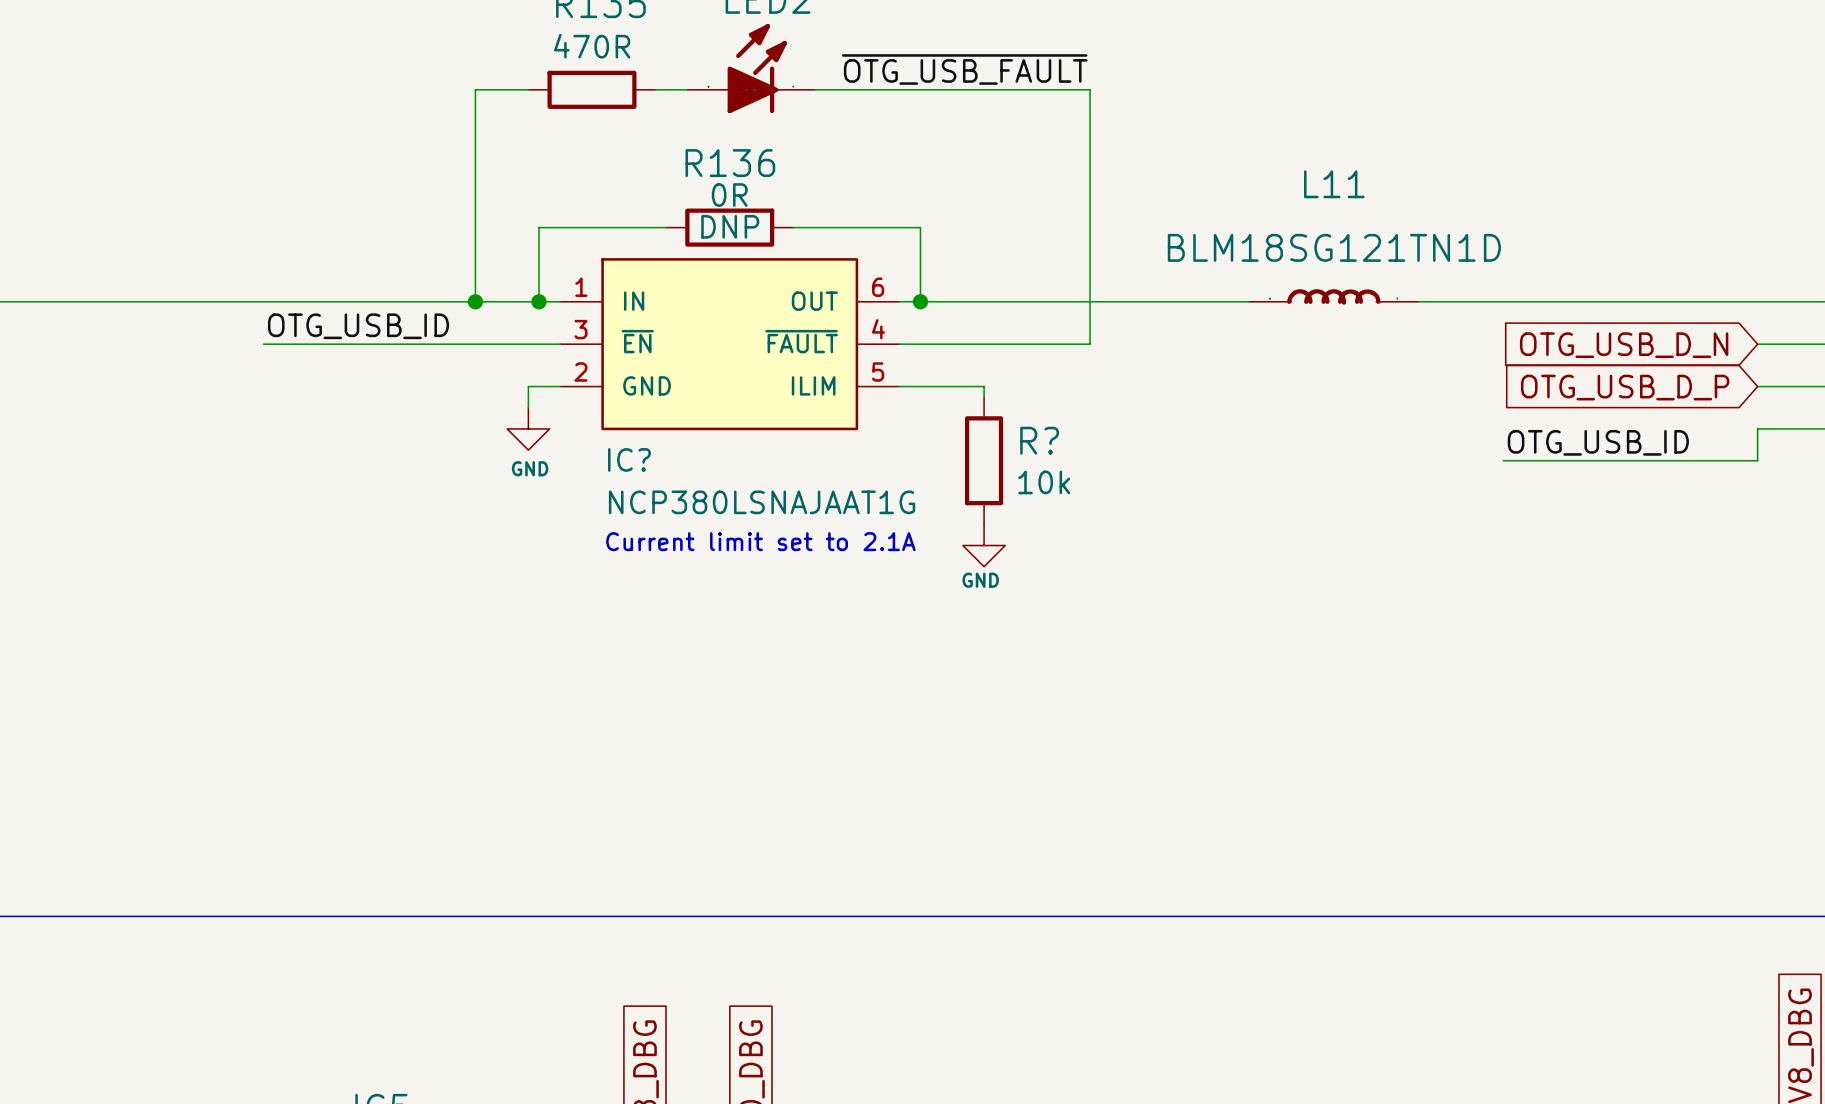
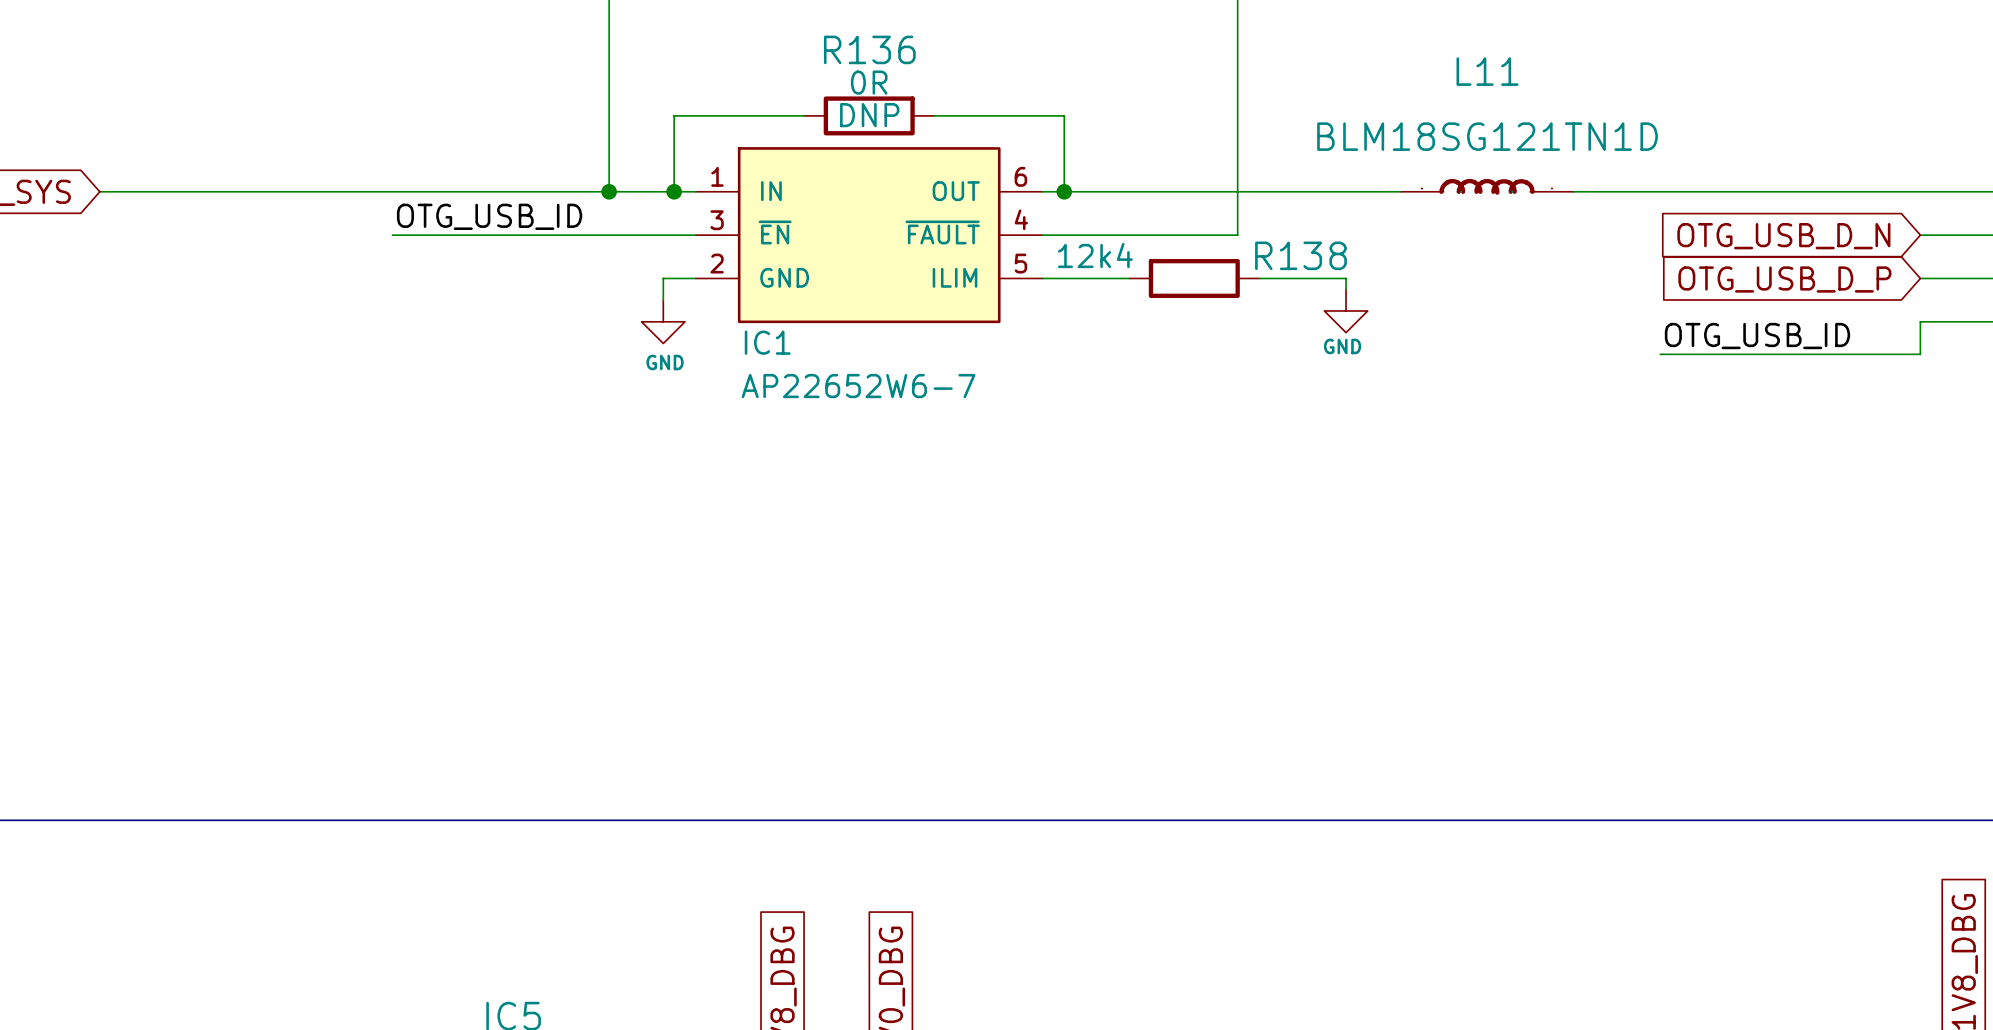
wire: (984, 386) (984, 397) -> none
R138: none -> (1194, 278)
wire: none -> (1259, 278) (1346, 278) (1346, 289)
IC? name: IC? (629, 459) -> IC1 (767, 342)
R?: (984, 460) -> none
IC? value: NCP380LSNAJAAT1G (762, 502) -> AP22652W6-7 (858, 386)
text: Current limit set to 2.1A (760, 541) -> none
power symbol position: GND (984, 545) -> GND (1346, 310)

